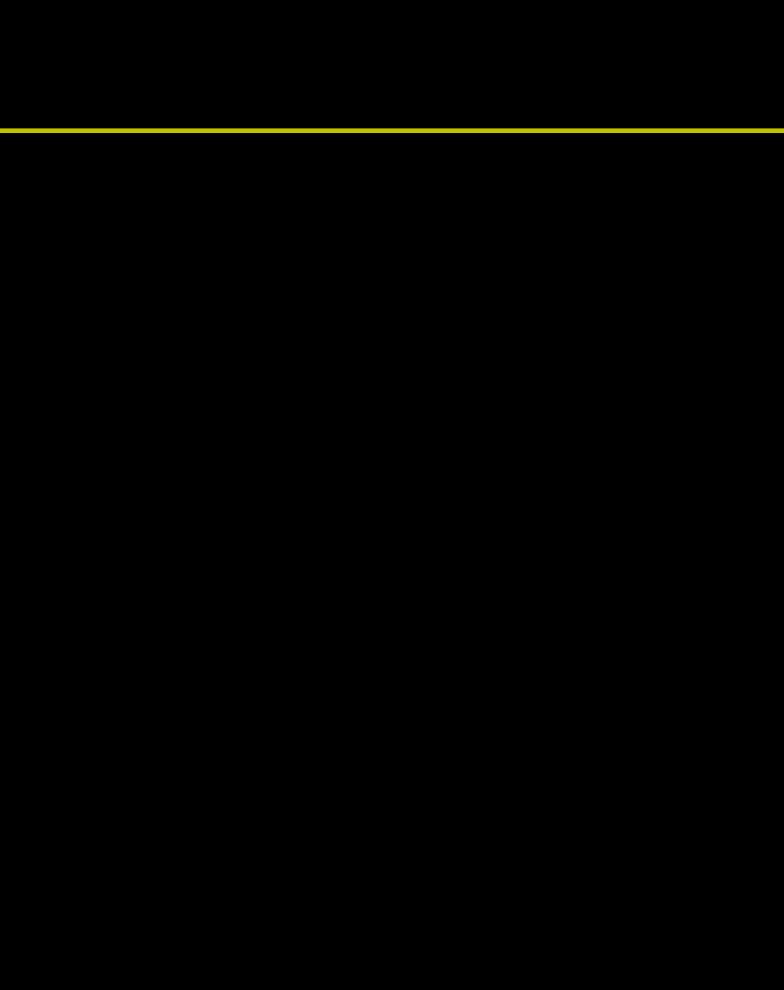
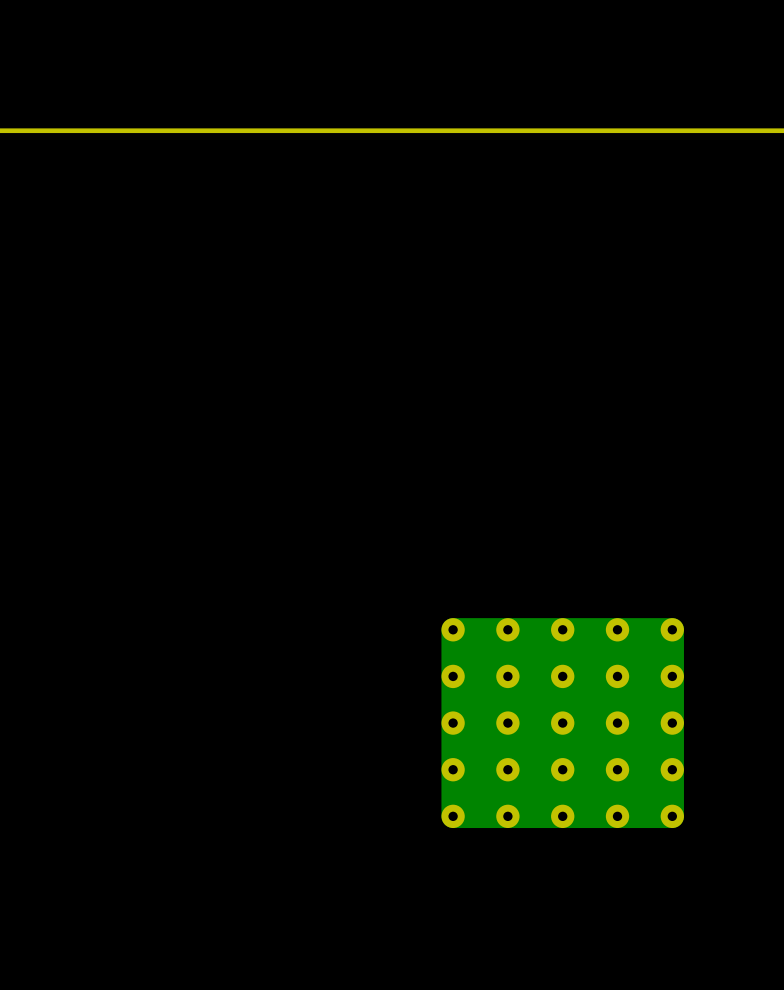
part: none -> (562, 723)

